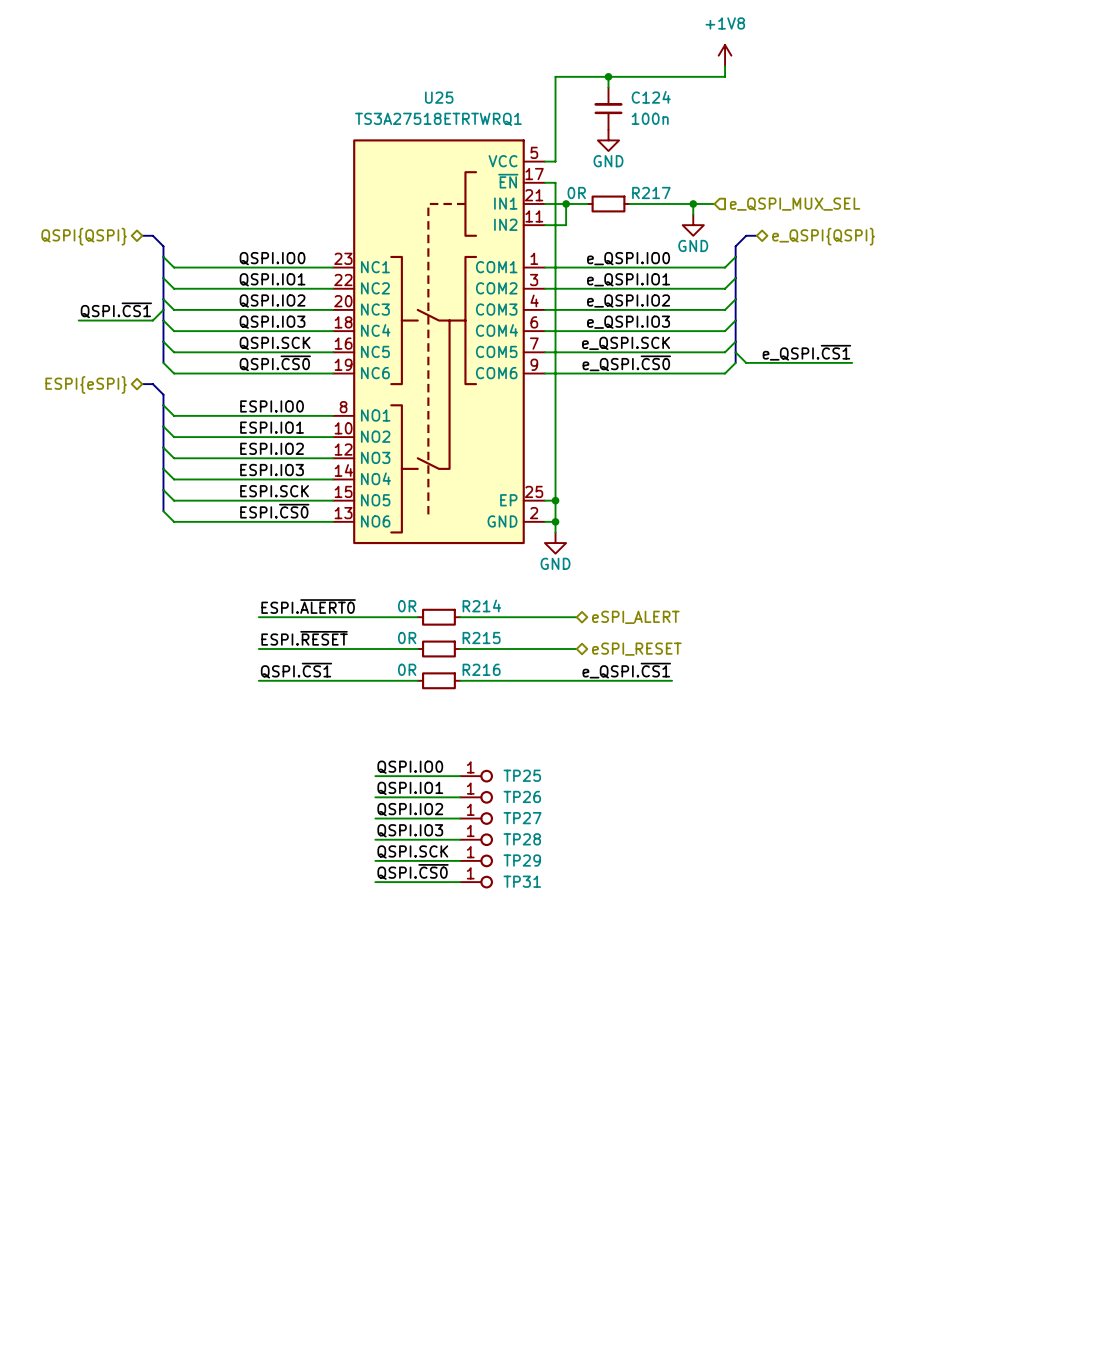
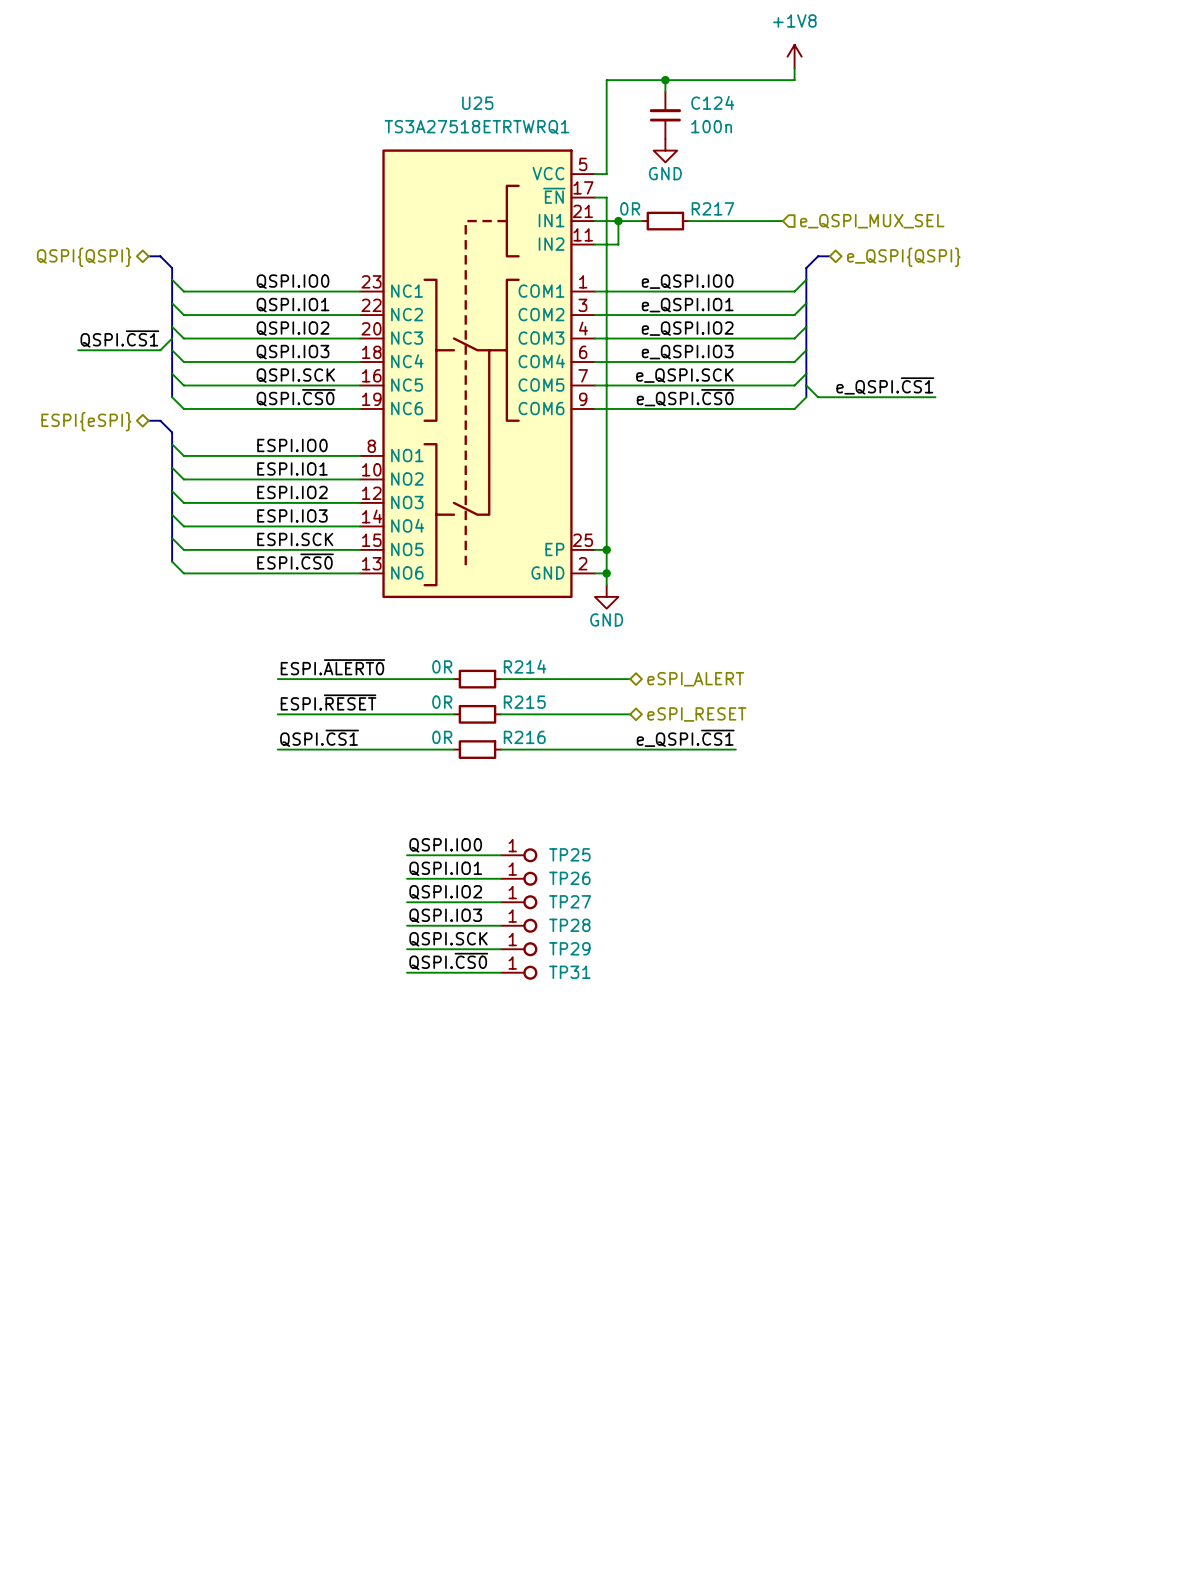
wire: (693, 203) (693, 214) -> none
junction: (693, 203) -> none
power symbol: GND (693, 225) -> none

